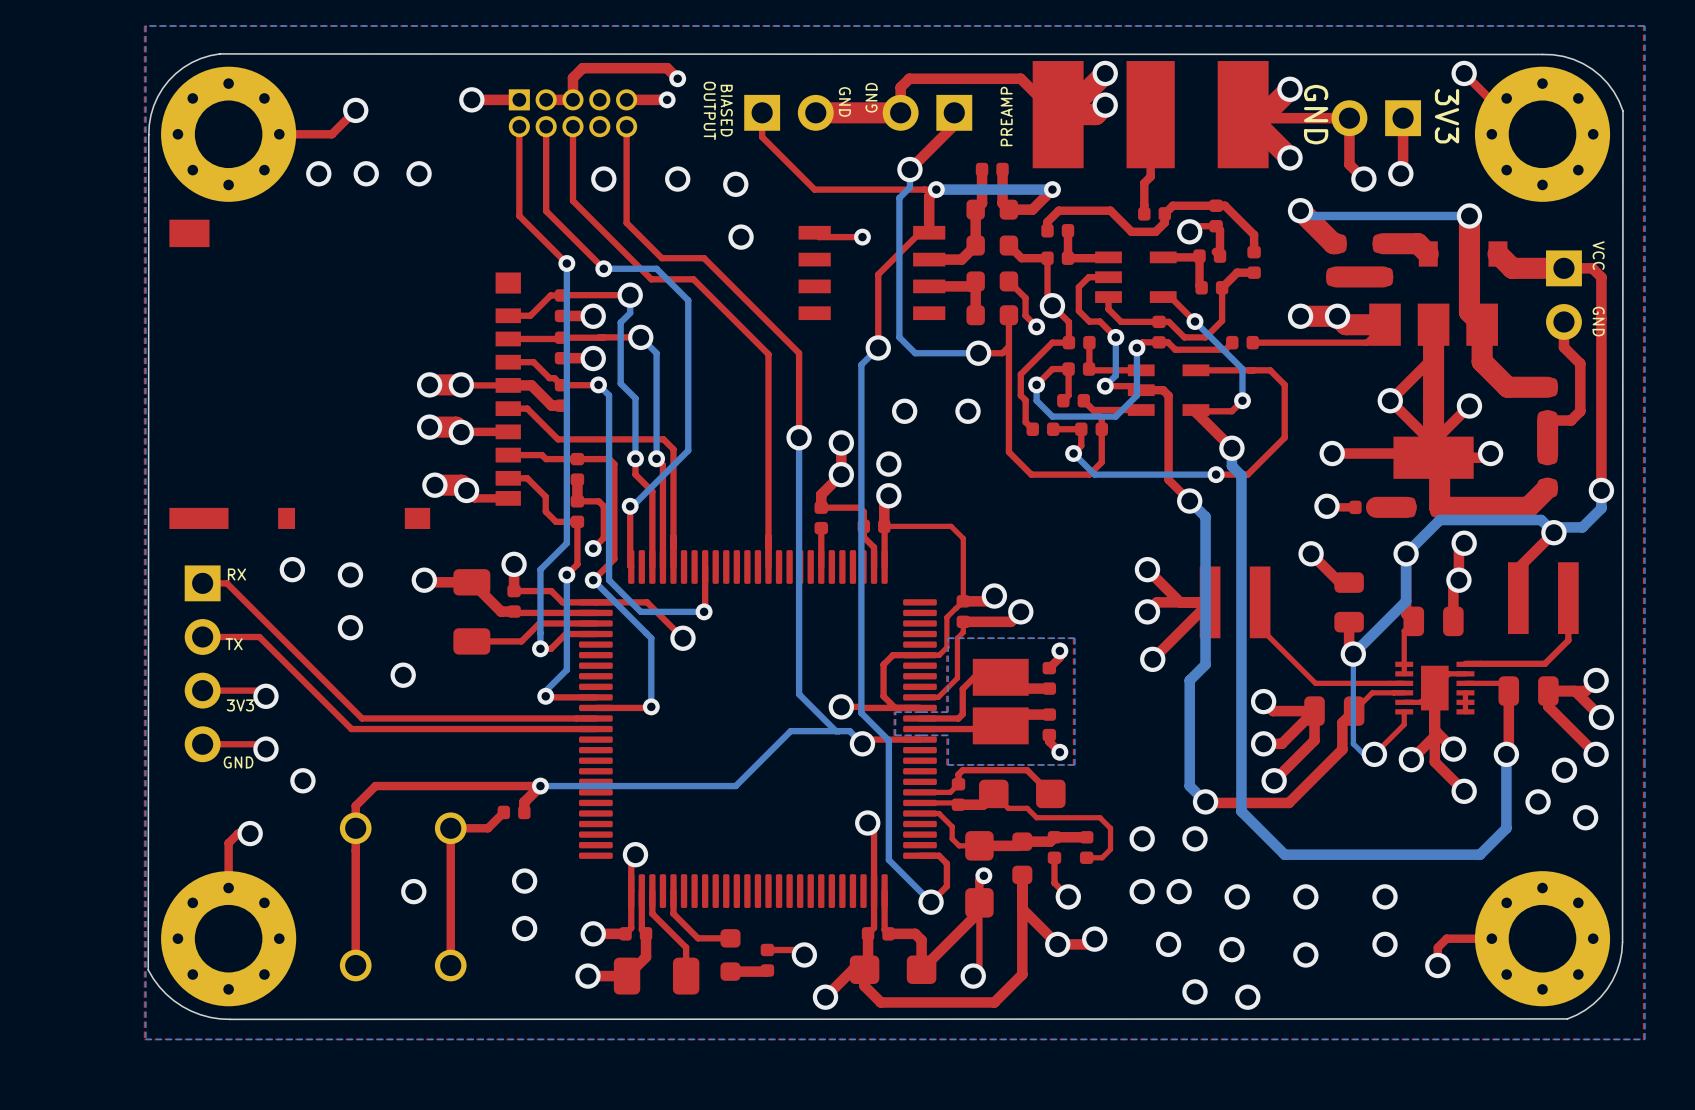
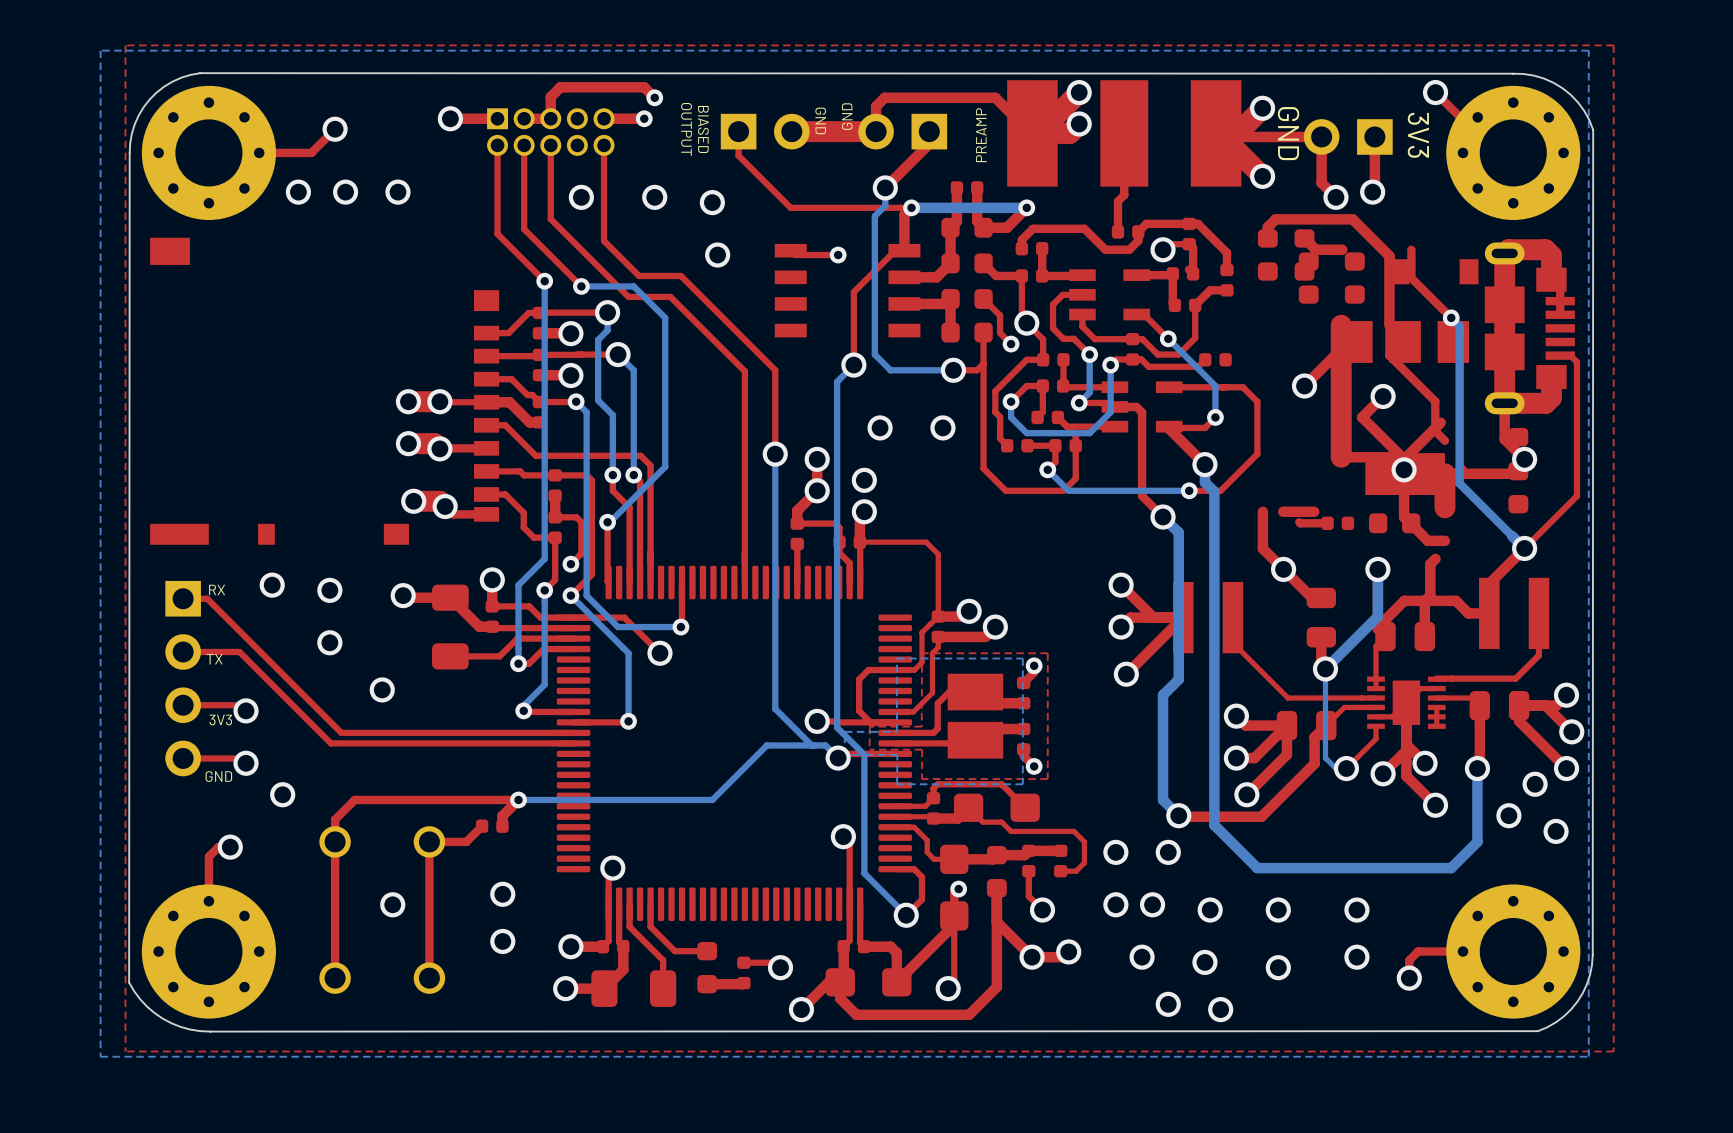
bottom zone outline: (1644, 25) (1644, 1039) (145, 1039) (145, 25) (1644, 25) -> (1588, 50) (1588, 1056) (100, 1056) (100, 50) (1588, 50)
bottom track: (1300, 210) (1305, 215) (1469, 215) -> none
via: (1300, 210) -> none
top track: (1303, 210) (1300, 210) (1333, 243) (1336, 243) -> none
top track: (1469, 215) (1469, 312) (1482, 324) (1482, 361) (1507, 387) (1547, 387) -> none
via: (1469, 215) -> none
top track: none -> (1267, 238) (1267, 227) (1275, 219) (1352, 219) (1389, 256) (1389, 355) (1435, 401) (1435, 431) (1444, 440)
top track: none -> (1304, 238) (1315, 249) (1342, 249)
top track: none -> (1411, 249) (1411, 278) (1451, 317)
part: none -> (1267, 255)
part: none -> (1304, 255)
top track: (1382, 243) (1418, 243) (1428, 253) -> none
part footprint: [1546, 250, 1582, 340] -> [1484, 242, 1575, 415]
top track: (1497, 253) (1512, 268) (1592, 268) (1601, 277) (1601, 490) -> none
text: VCC (1598, 255) -> none
top track: (1382, 276) (1336, 276) -> none
top track: none -> (1560, 314) (1560, 288) (1551, 279) (1551, 255) (1545, 249) (1508, 249) (1504, 253) (1504, 403)
via: none -> (1451, 317)
top track: (1300, 316) (1337, 316) (1345, 324) (1385, 324) (1367, 342) (1252, 342) -> none
via: (1300, 316) -> none
via: (1337, 316) -> none
top track: (1563, 321) (1563, 347) (1580, 363) (1580, 411) (1571, 420) (1547, 420) (1547, 454) -> none
text: GND (1598, 321) -> none
top track: none -> (1560, 355) (1570, 355) (1577, 362) (1577, 496) (1524, 548)
top track: none -> (1551, 376) (1551, 397) (1545, 403) (1504, 403)
top track: none -> (1304, 386) (1341, 349) (1341, 325) (1341, 457) (1391, 457) (1404, 469) (1404, 517) (1427, 540) (1444, 540)
via: none -> (1304, 386)
top track: (1411, 379) (1433, 357) (1433, 324) (1433, 457) -> none
top track: none -> (1504, 403) (1504, 439) (1524, 459) (1510, 473) (1444, 473) (1444, 507)
via position: (1390, 400) -> (1383, 396)
via: (1469, 406) -> none
via: none -> (1524, 459)
top track: (1332, 453) (1429, 453) (1433, 457) -> none
via: (1332, 453) -> none
via: none -> (1404, 469)
via: (1490, 453) -> none
top track: (1433, 457) (1439, 463) (1439, 507) (1528, 507) (1547, 488) -> none
bottom track: (1601, 490) (1601, 508) (1582, 527) (1559, 527) (1553, 532) -> none
via: (1601, 490) -> none
top track: none -> (1262, 511) (1262, 548) (1283, 569)
top track: none -> (1314, 511) (1283, 511)
via: (1326, 506) -> none
top track: (1406, 507) (1376, 507) -> none
bottom track: (1541, 520) (1439, 520) (1406, 553) -> (1512, 535) (1459, 483) (1459, 326) (1451, 317)
via: (1464, 543) -> none
via: (1458, 580) -> none
top track: none -> (1489, 613) (1468, 613) (1455, 600) (1404, 600) (1385, 619) (1385, 636)
bottom zone outline: (1074, 638) (948, 638) (947, 712) (895, 712) (895, 735) (948, 735) (948, 764) (1074, 764) (1074, 638) -> (1022, 658) (897, 658) (896, 731) (844, 731) (844, 754) (897, 754) (897, 784) (1022, 784) (1022, 658)

